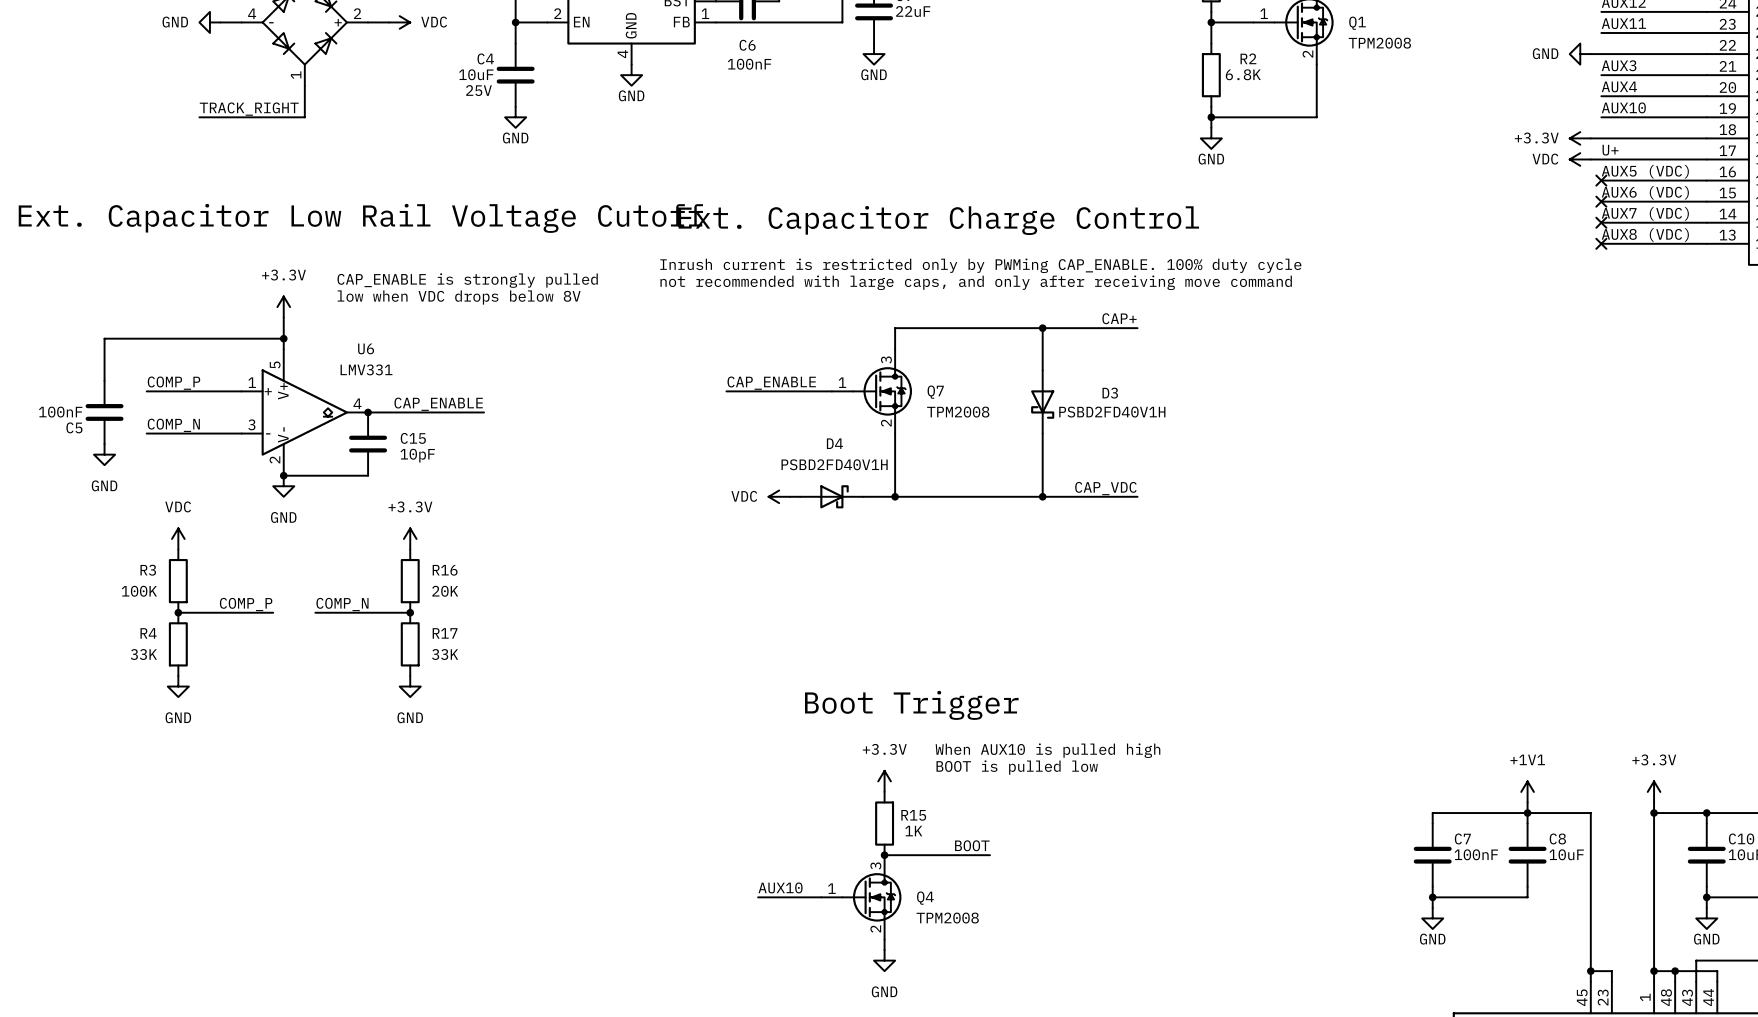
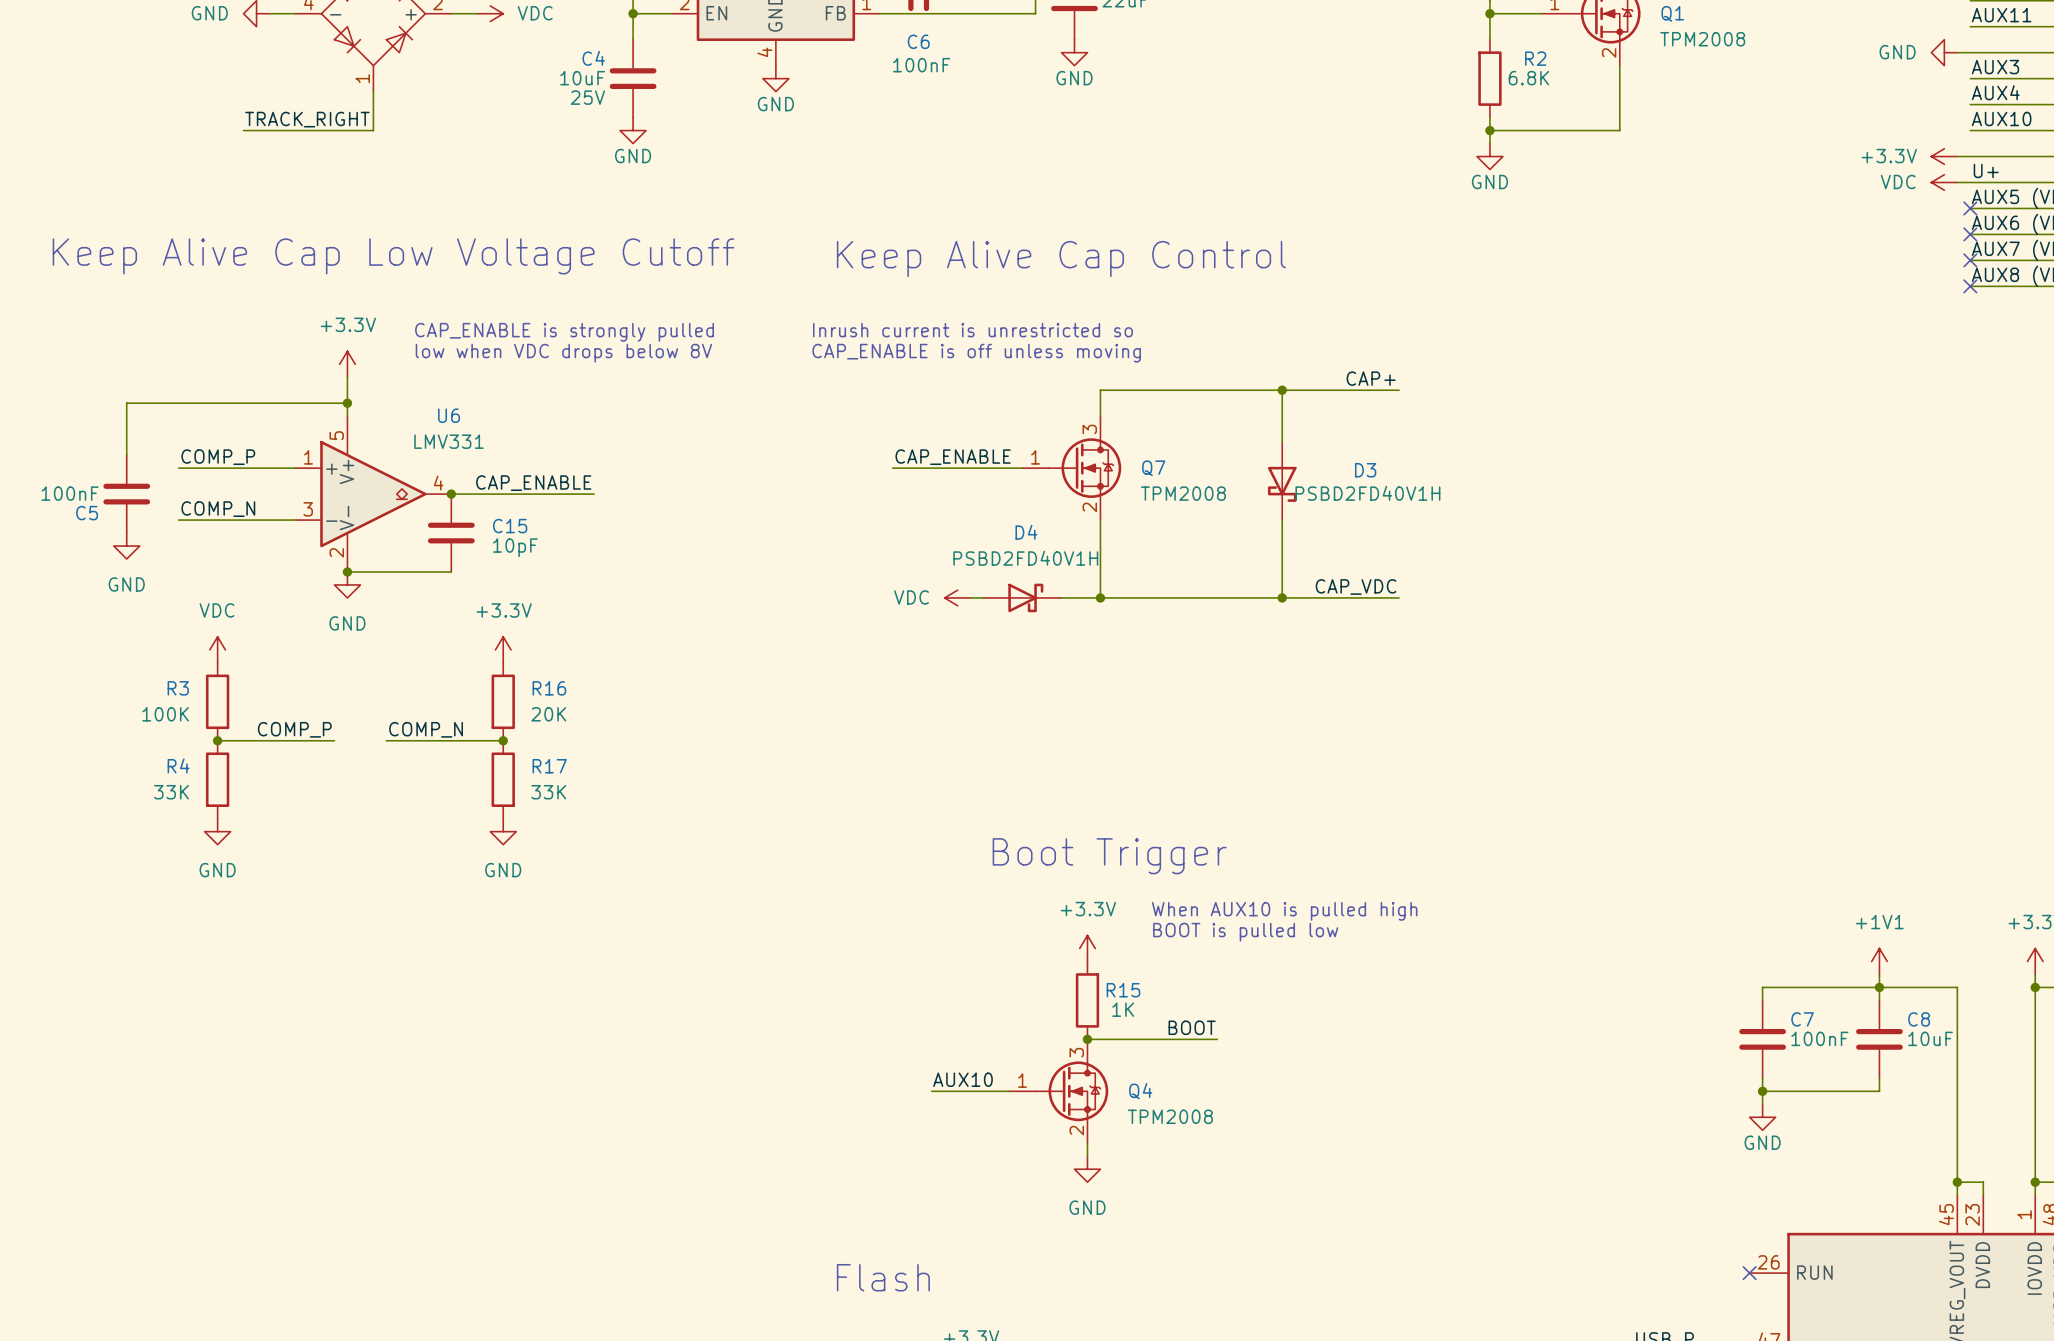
text: Ext. Capacitor Low Rail Voltage Cutoff (360, 218) -> Keep Alive Cap Low Voltage Cutoff (393, 256)
text: Ext. Capacitor Charge Control (938, 220) -> Keep Alive Cap Control (1061, 258)
text: Inrush current is restricted only by PWMing CAP_ENABLE. 100% duty cycle (980, 265) -> none
text: not recommended with large caps, and only after receiving move command (976, 282) -> Inrush current is unrestricted so (972, 330)
text: none -> CAP_ENABLE is off unless moving (976, 353)

